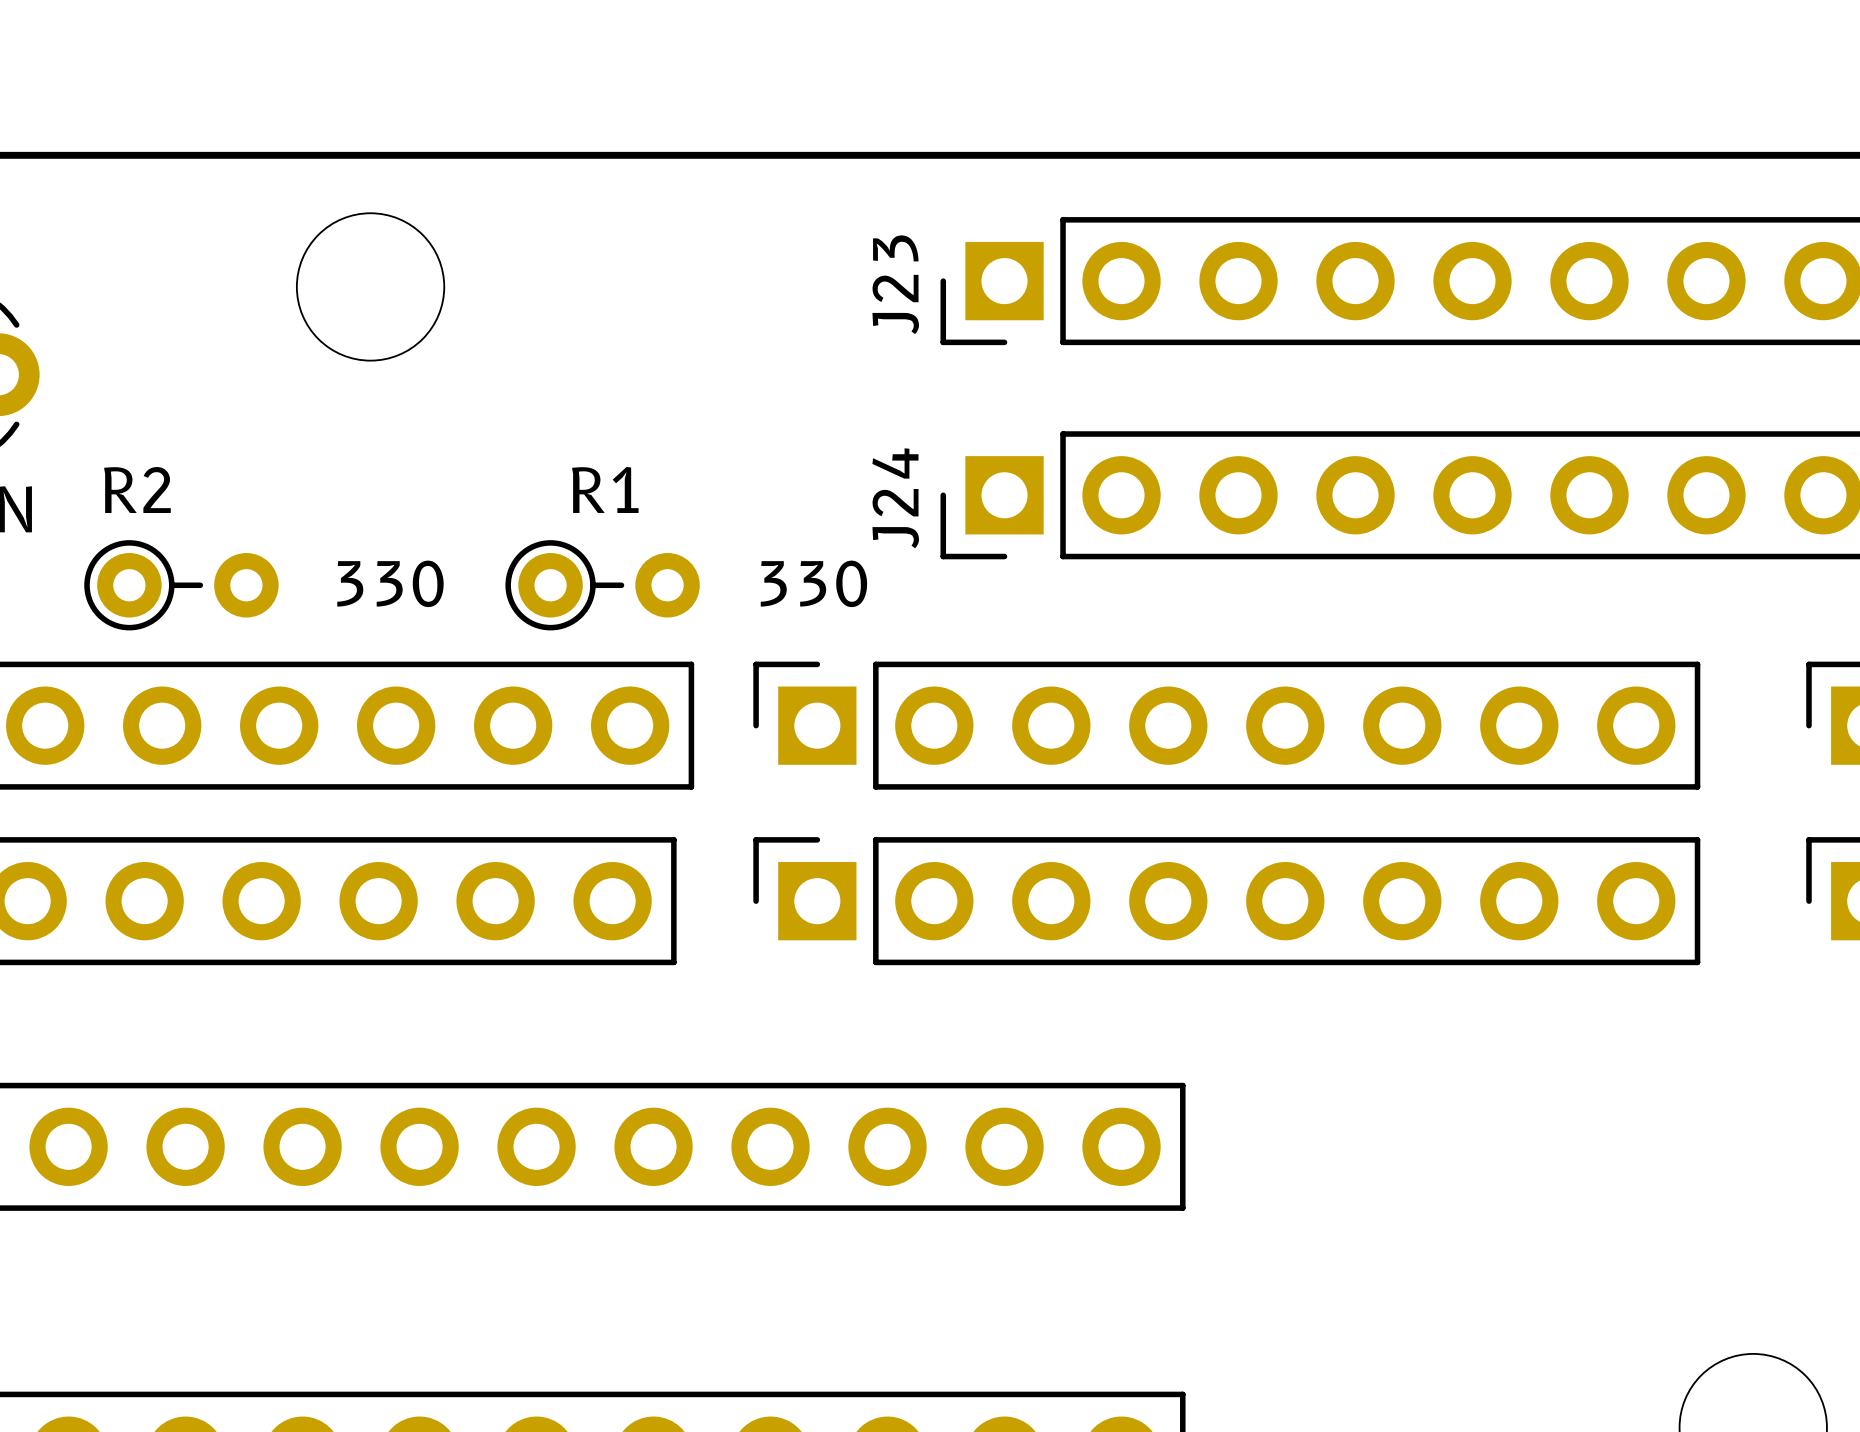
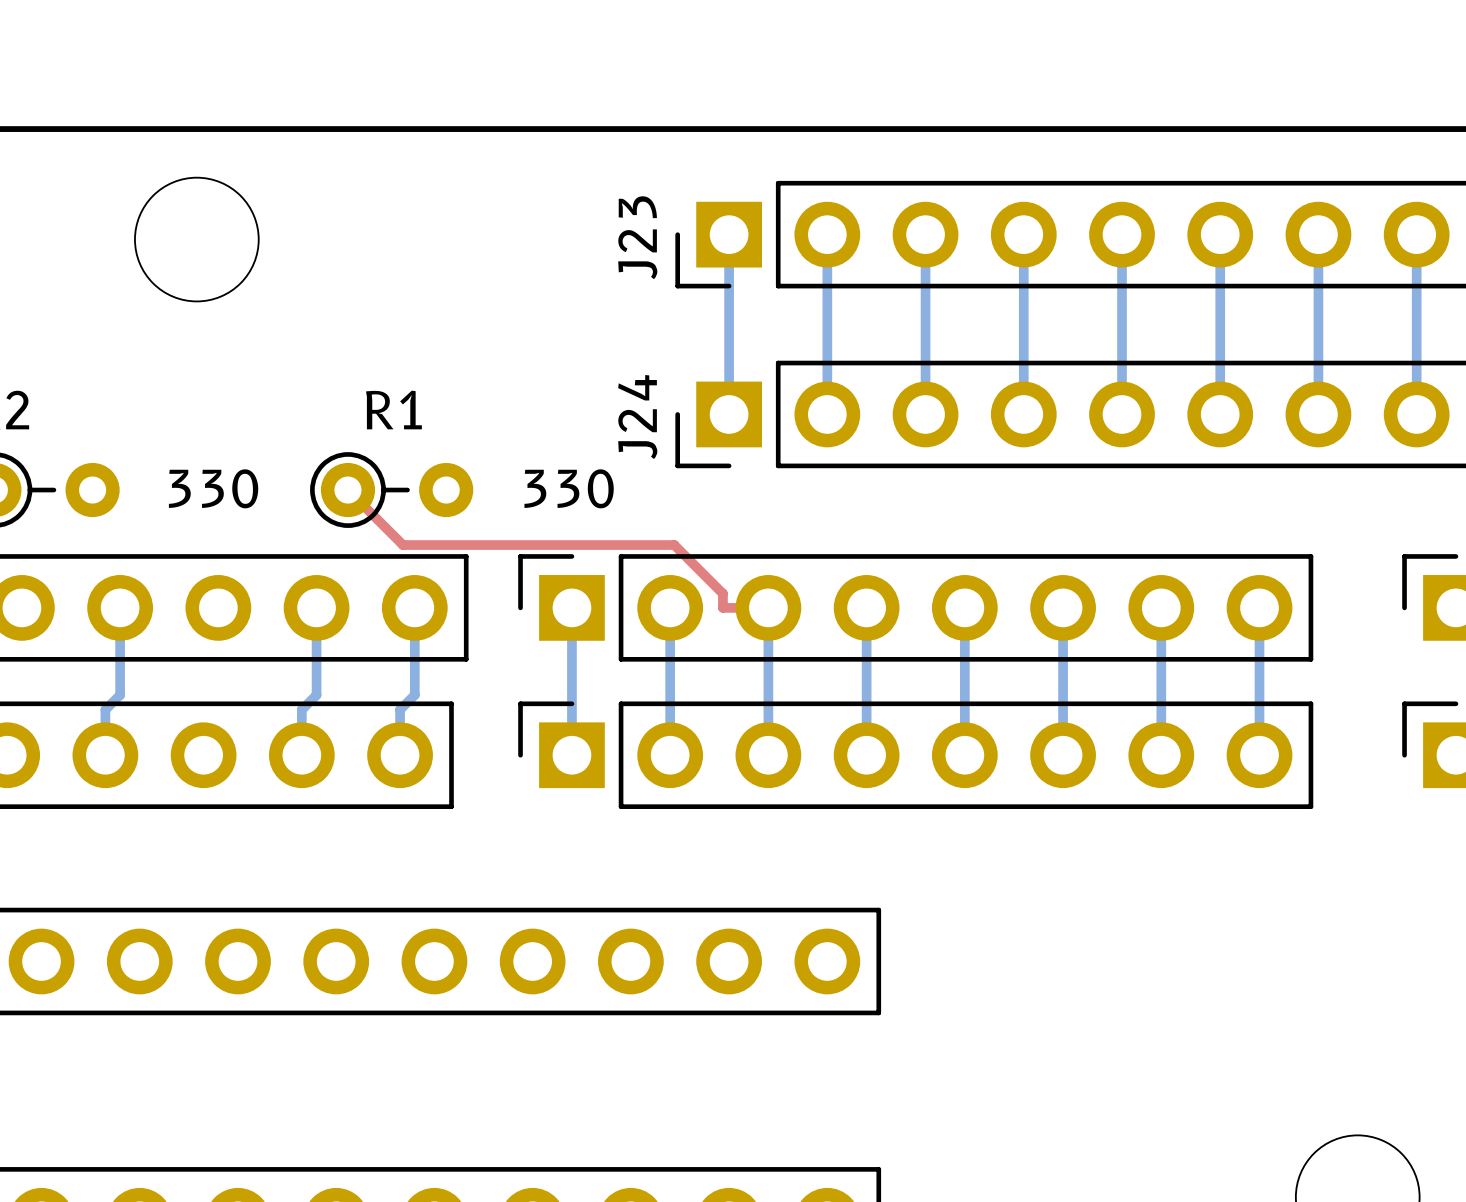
bottom track: none -> (729, 234) (729, 414)
bottom track: none -> (827, 234) (827, 414)
bottom track: none -> (925, 234) (925, 414)
bottom track: none -> (1023, 234) (1023, 414)
bottom track: none -> (1122, 234) (1122, 414)
bottom track: none -> (1220, 234) (1220, 414)
bottom track: none -> (1318, 234) (1318, 414)
bottom track: none -> (1416, 234) (1416, 414)
top track: none -> (347, 490) (402, 545) (674, 545) (722, 593) (722, 607) (768, 607)
bottom track: none -> (120, 607) (120, 695) (105, 709) (105, 755)
bottom track: none -> (316, 607) (316, 695) (301, 709) (301, 755)
bottom track: none -> (414, 607) (414, 695) (400, 709) (400, 755)
bottom track: none -> (571, 607) (571, 755)
bottom track: none -> (670, 607) (670, 755)
bottom track: none -> (768, 607) (768, 755)
bottom track: none -> (866, 607) (866, 755)
bottom track: none -> (964, 607) (964, 755)
bottom track: none -> (1063, 607) (1063, 755)
bottom track: none -> (1161, 607) (1161, 755)
bottom track: none -> (1259, 607) (1259, 755)

